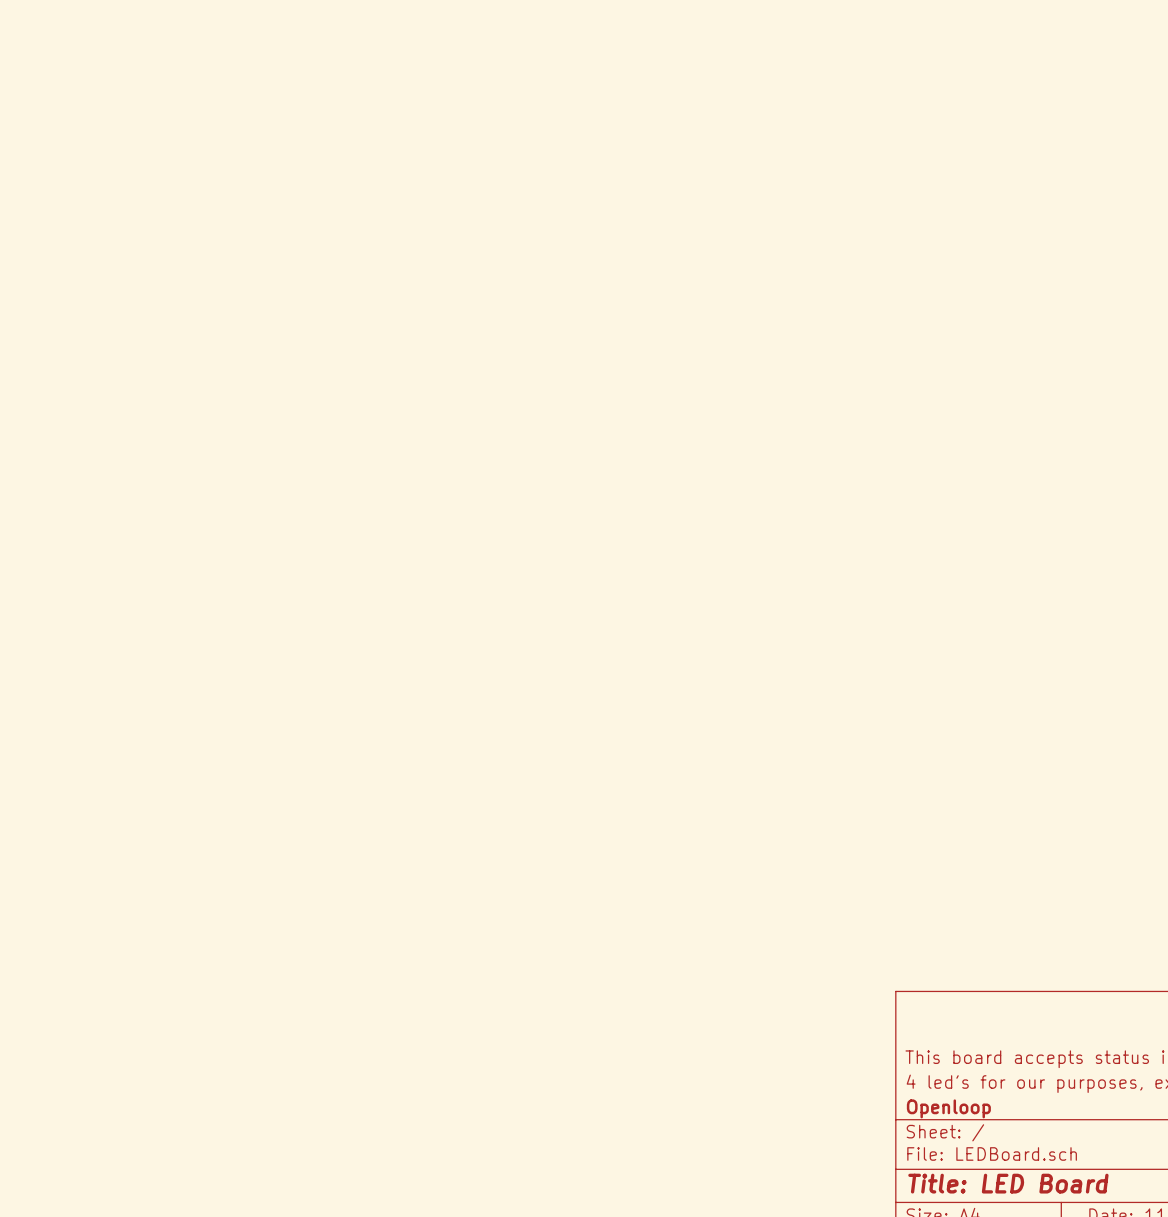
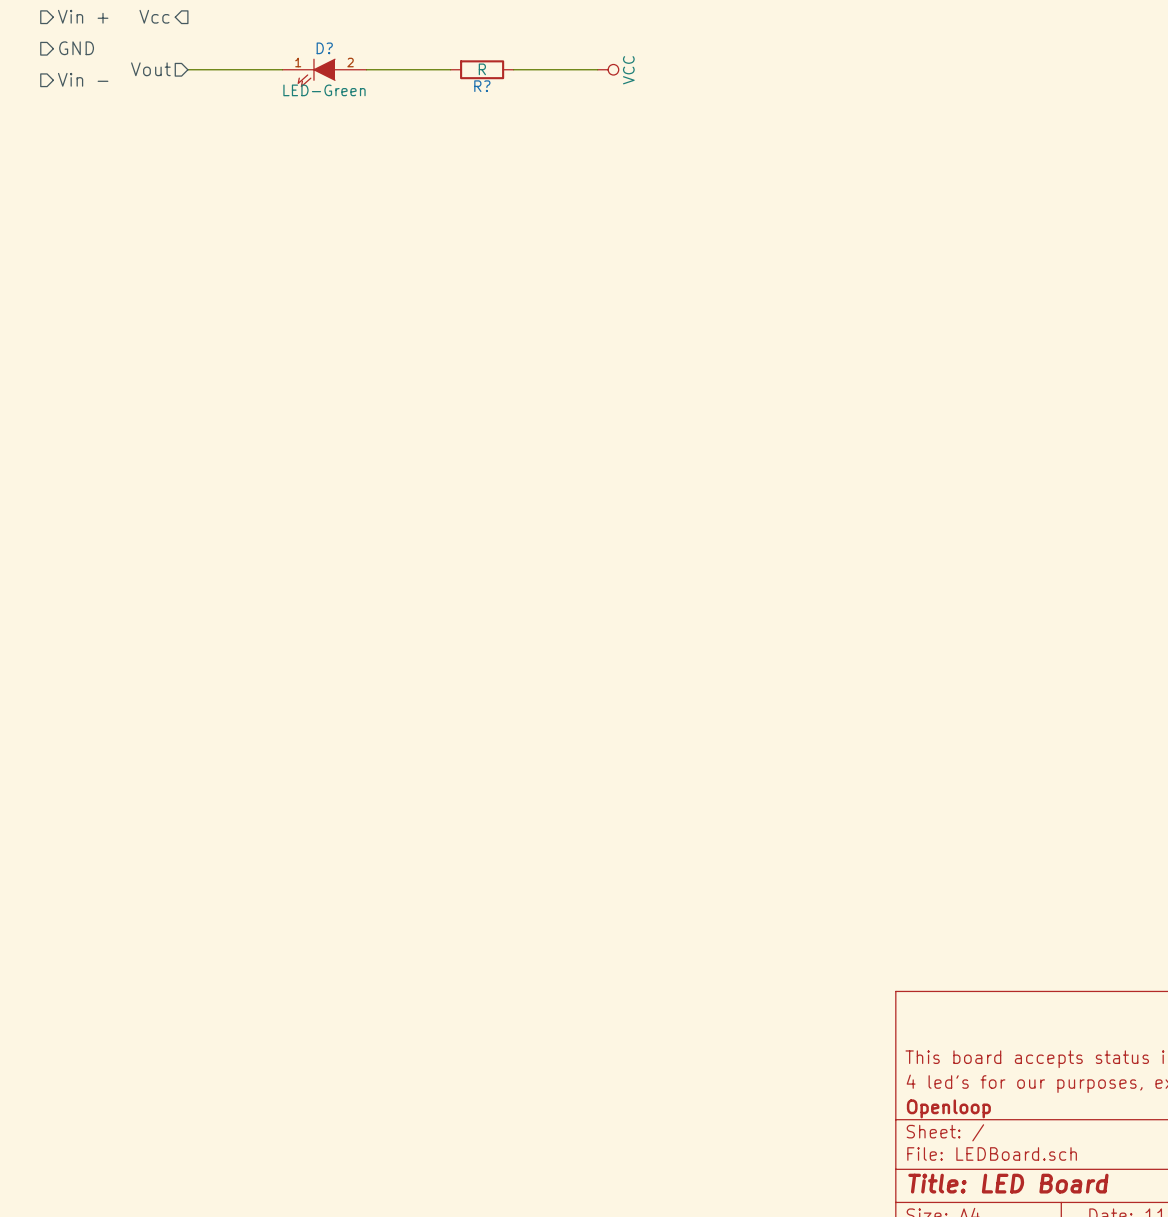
sheet pin: none -> Vin + (83, 16)
sheet pin: none -> Vcc (154, 16)
sheet pin: none -> GND (76, 48)
sheet pin: none -> Vout (150, 69)
wire: none -> (187, 69) (282, 69)
wire: none -> (366, 69) (450, 69)
R?: none -> R (482, 69)
wire: none -> (513, 69) (597, 69)
power symbol: none -> VCC (608, 69)
D?: none -> LED-Green (324, 72)
sheet pin: none -> Vin - (83, 79)

